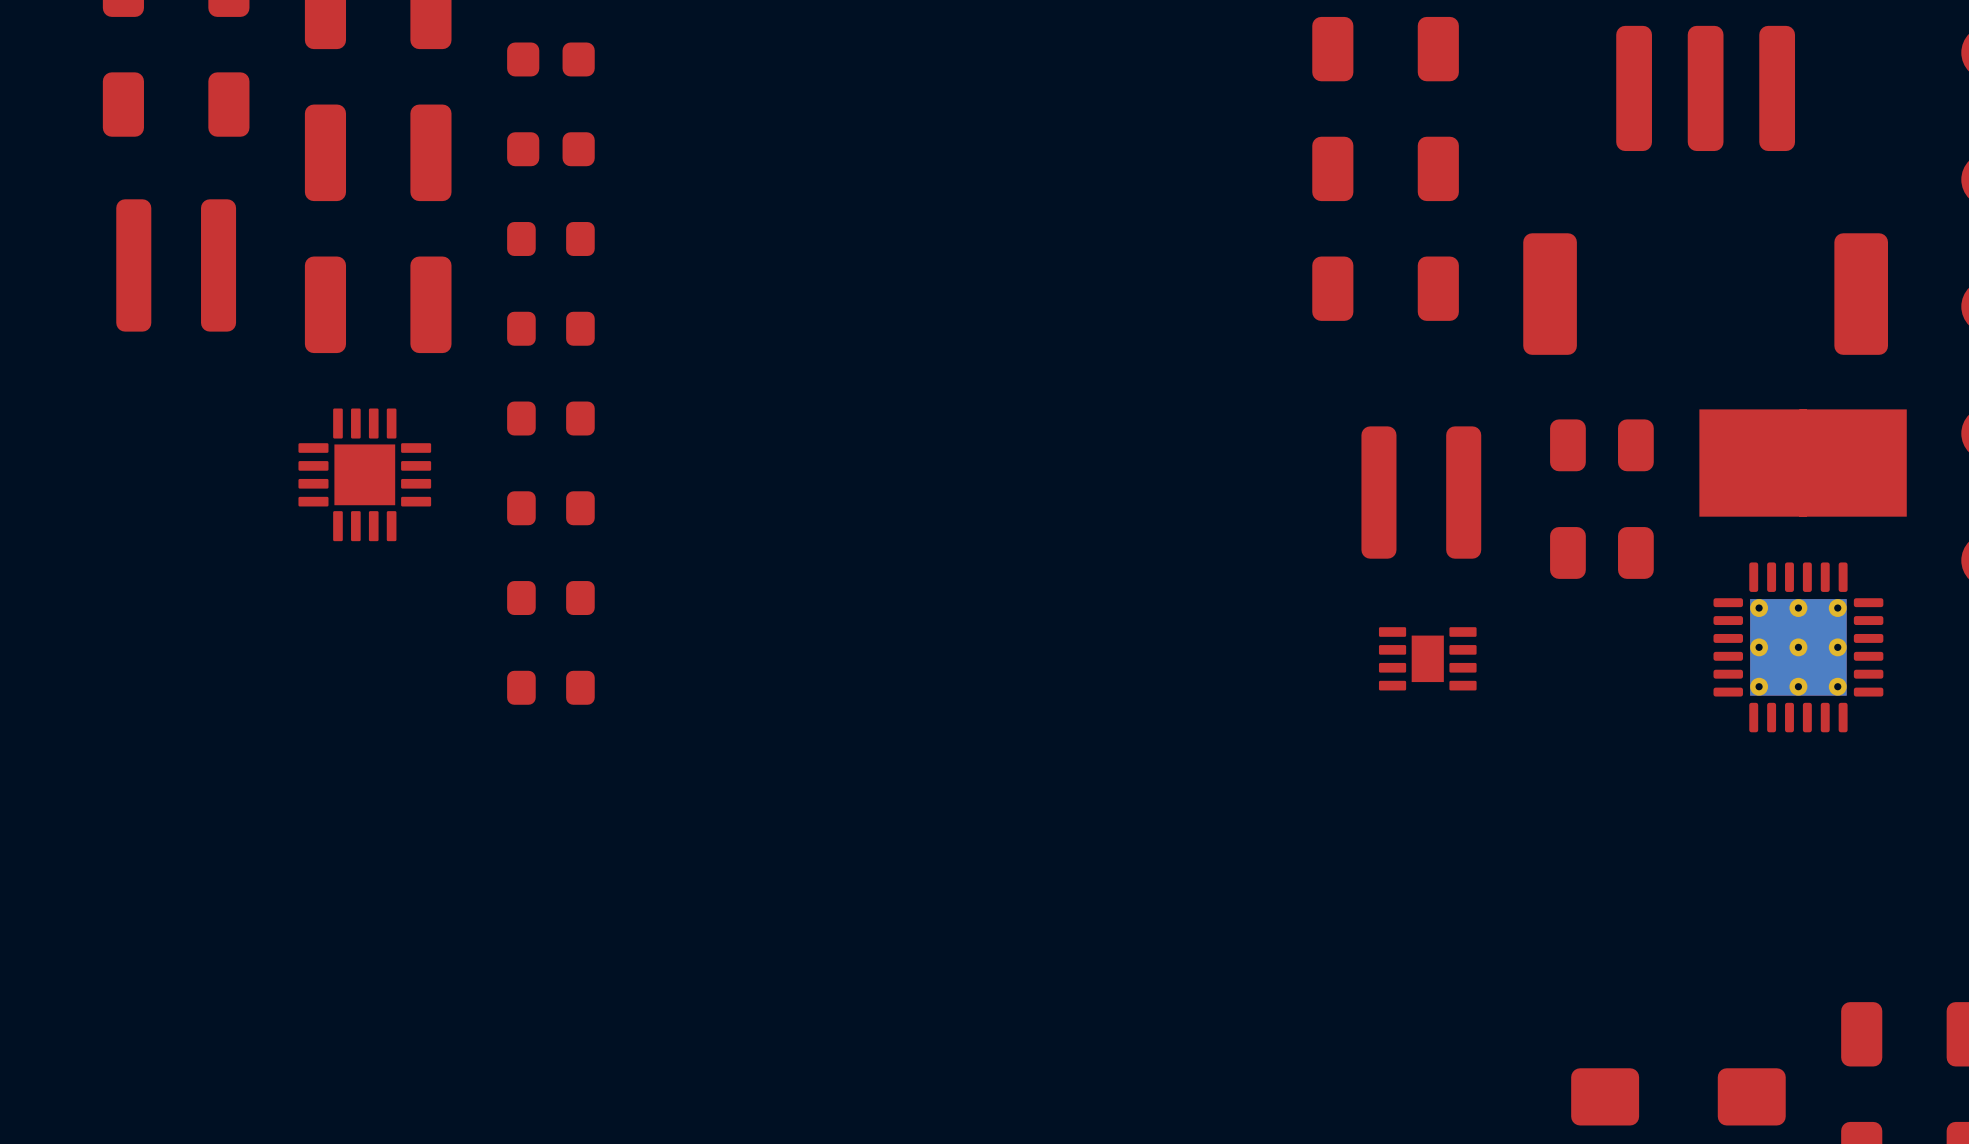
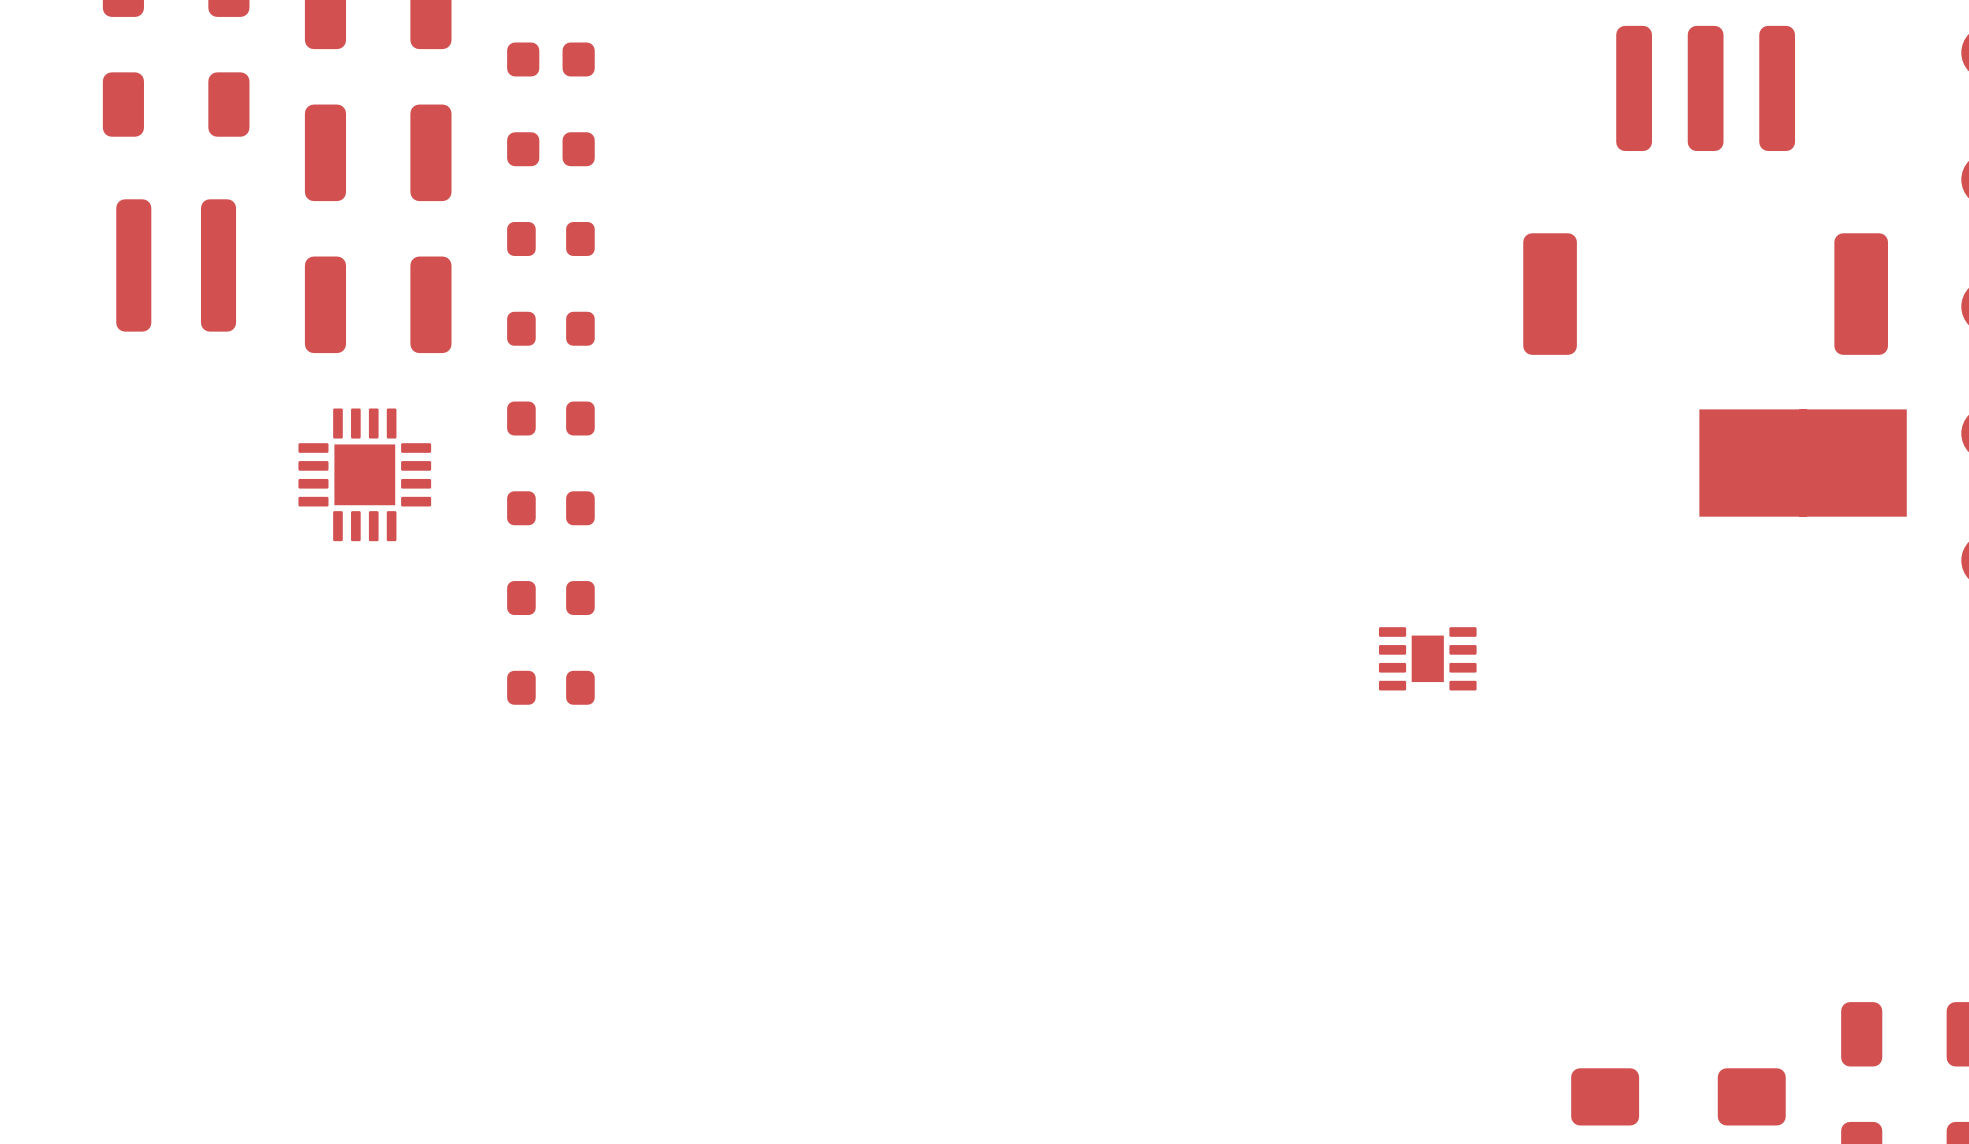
part: (1385, 49) -> none
part: (1385, 168) -> none
part: (1385, 288) -> none
part: (1601, 445) -> none
part: (1421, 492) -> none
part: (1601, 552) -> none
part: (1798, 647) -> none

